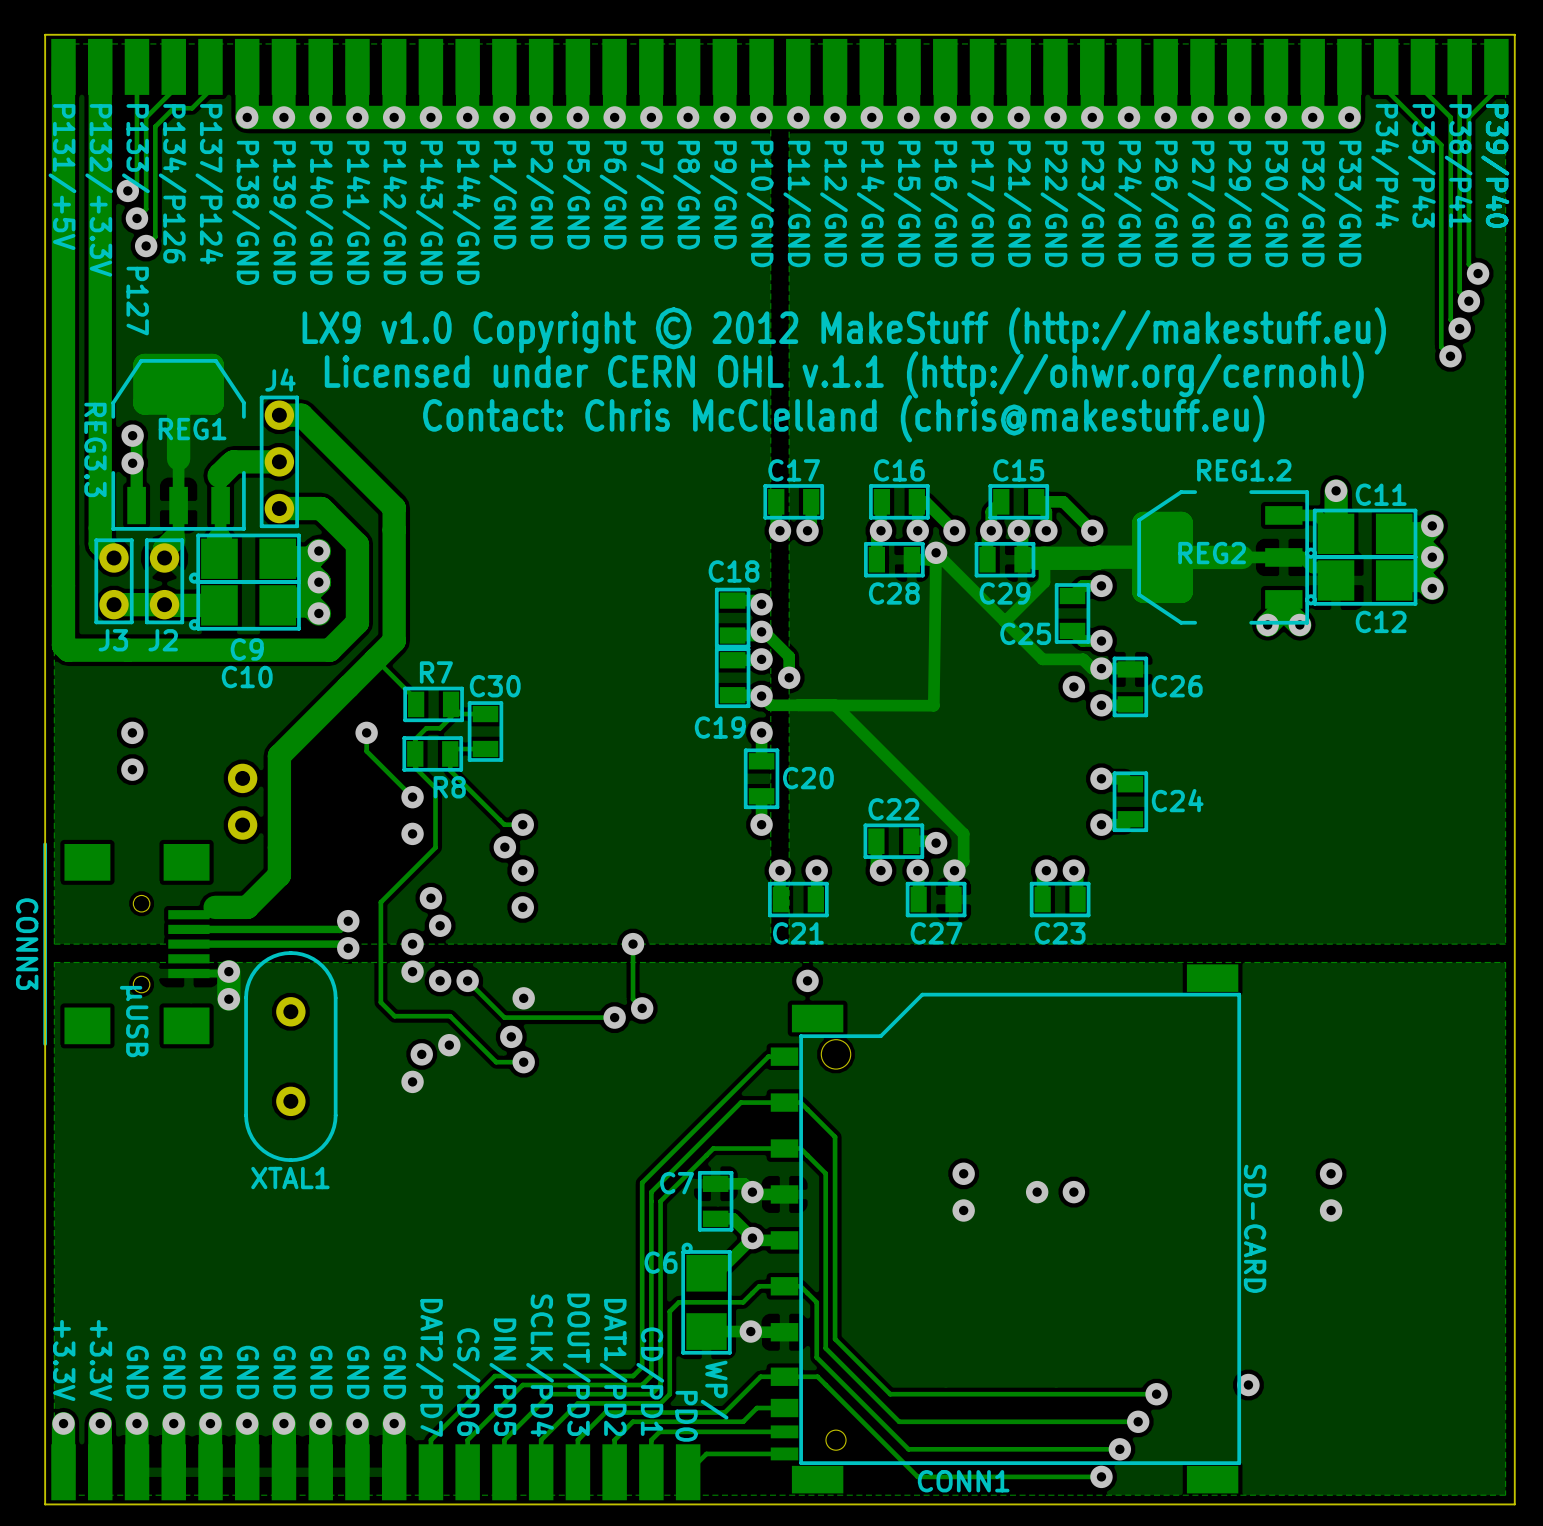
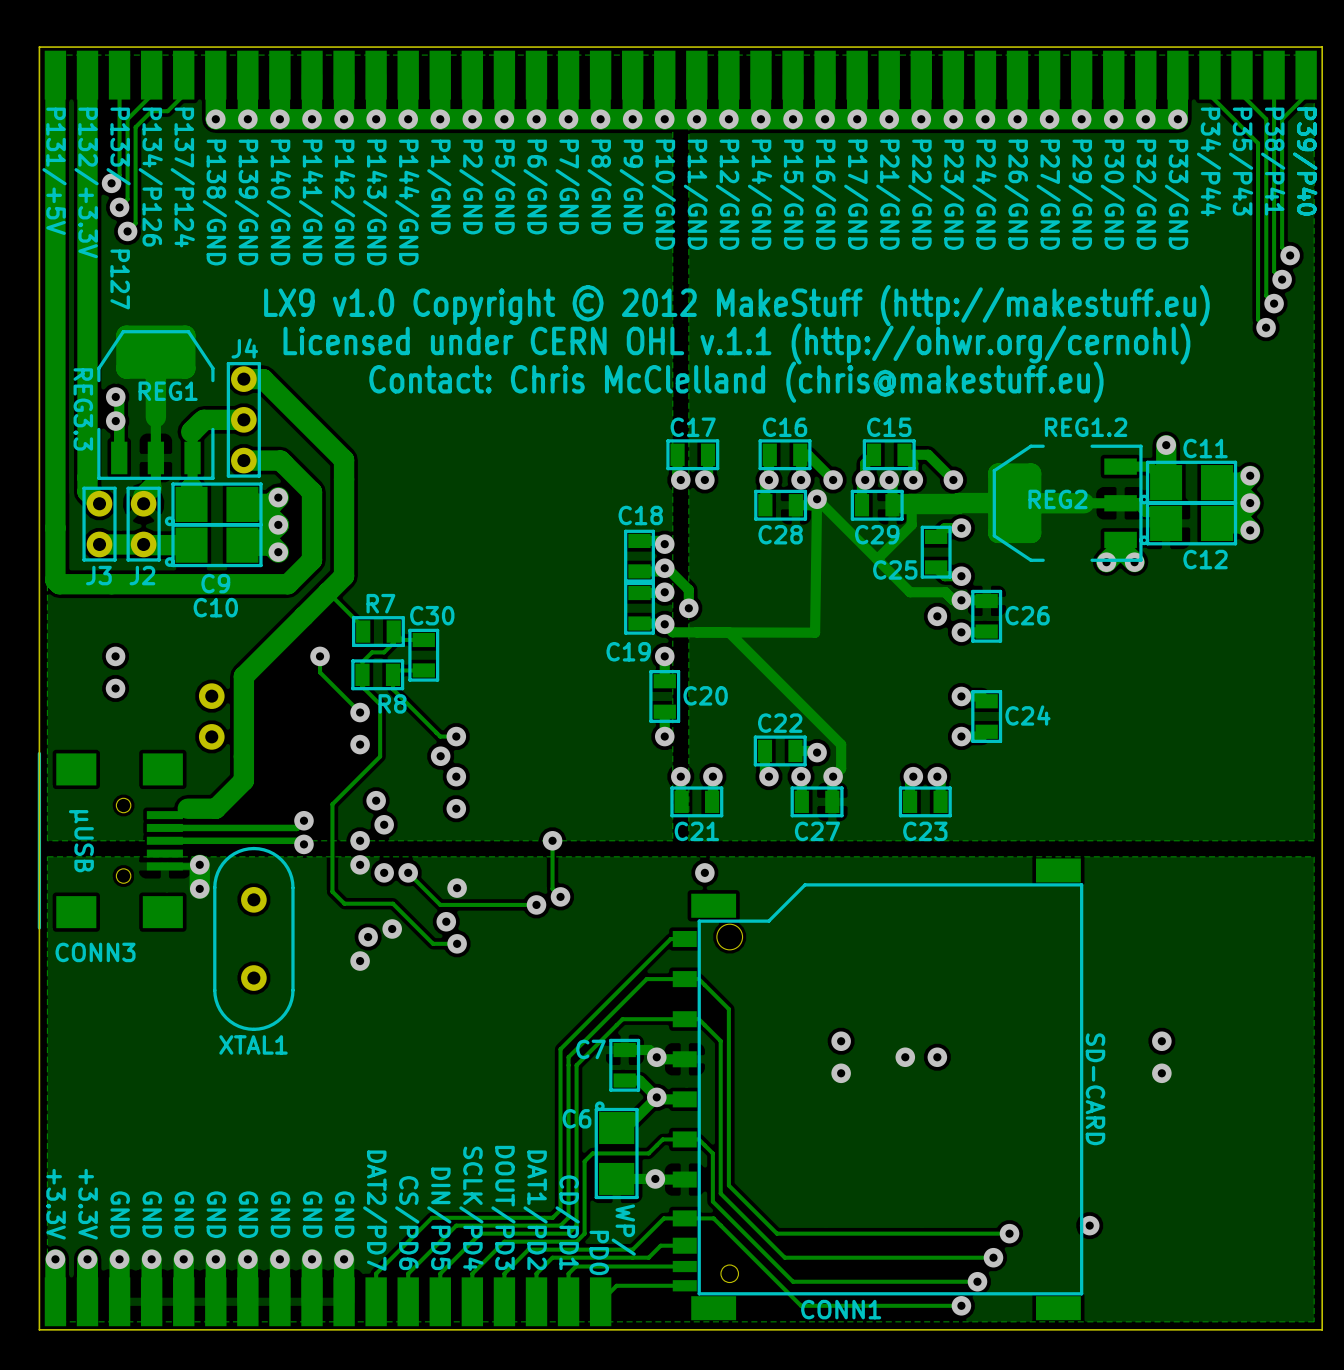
CONN3 name rotation: 0° (27, 944) -> 90° counterclockwise (95, 952)
CONN3 name position: CONN3 (27, 944) -> CONN3 (95, 952)
CONN3 value position: μUSB (134, 1021) -> μUSB (81, 841)

